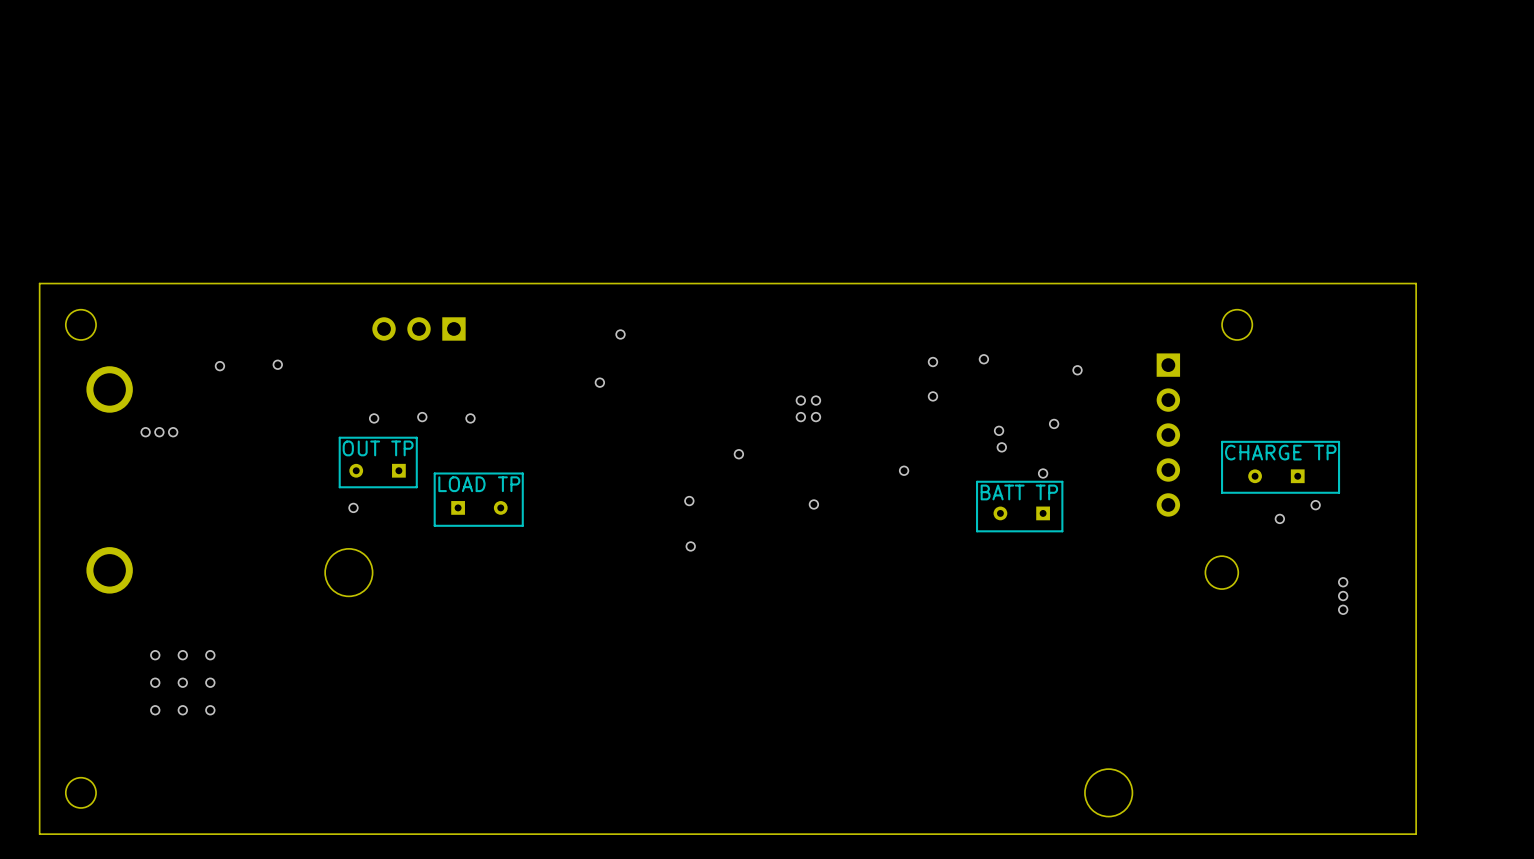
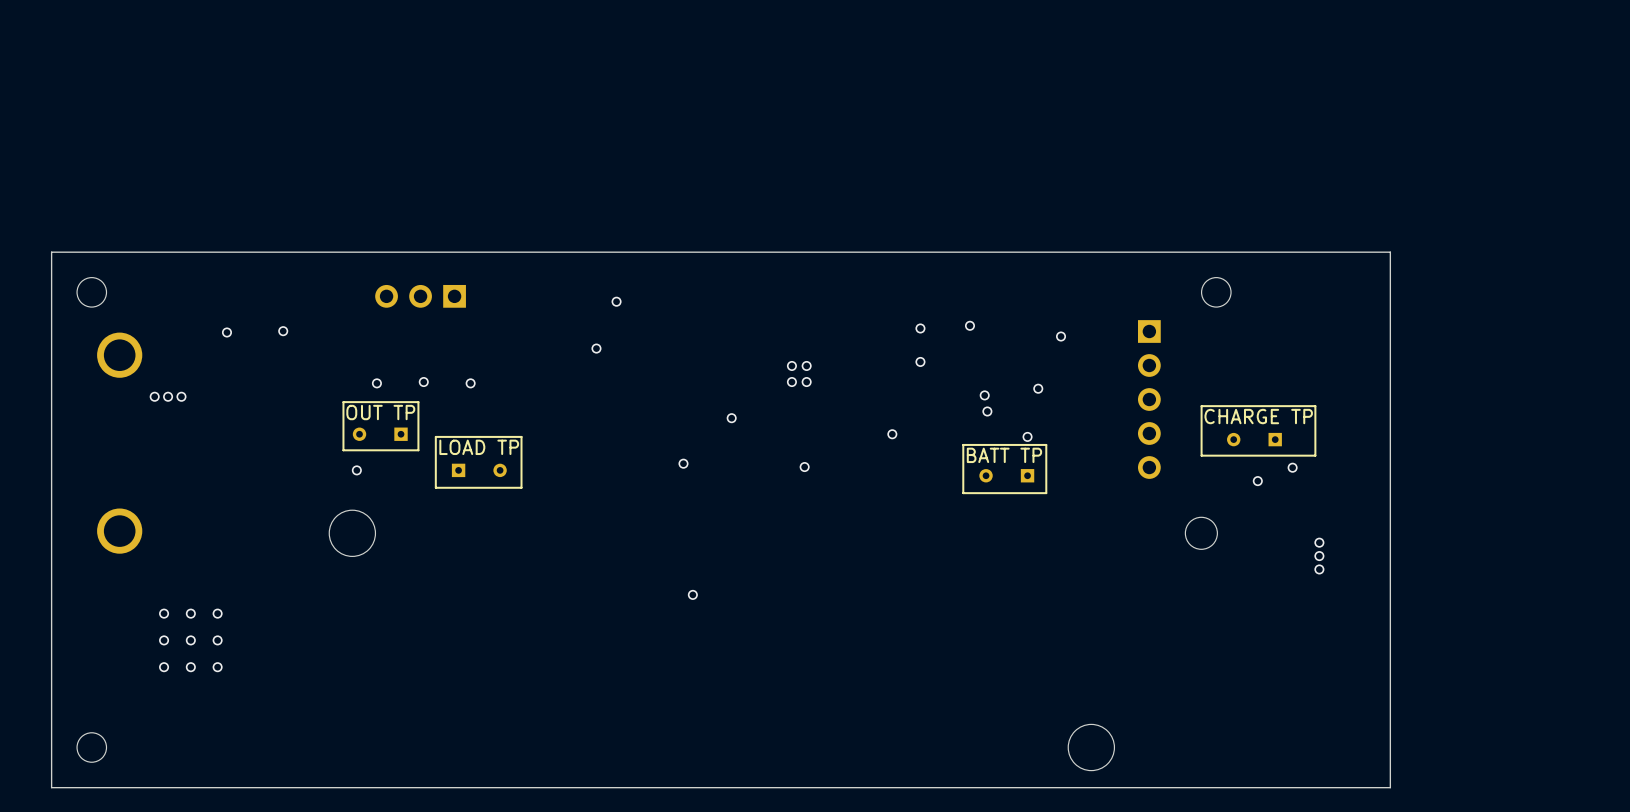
via: (690, 546) -> none
via: none -> (692, 594)

